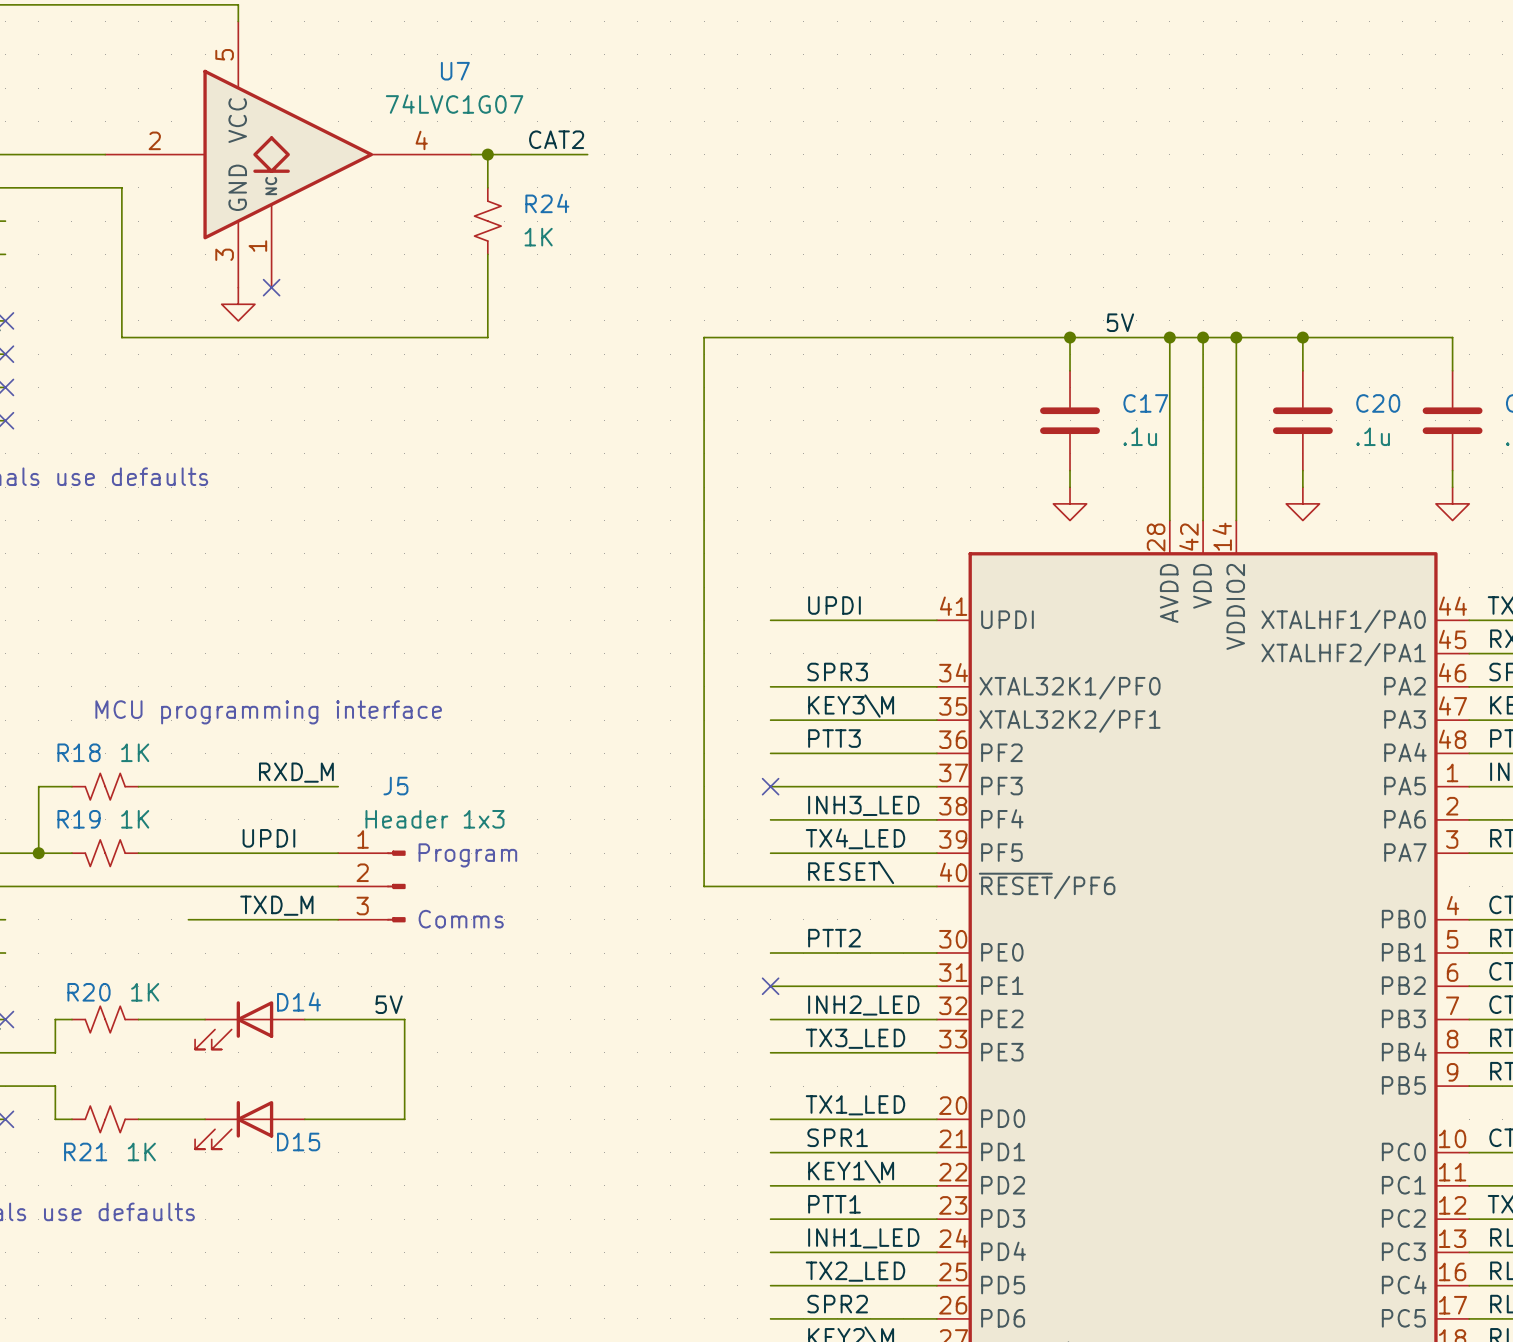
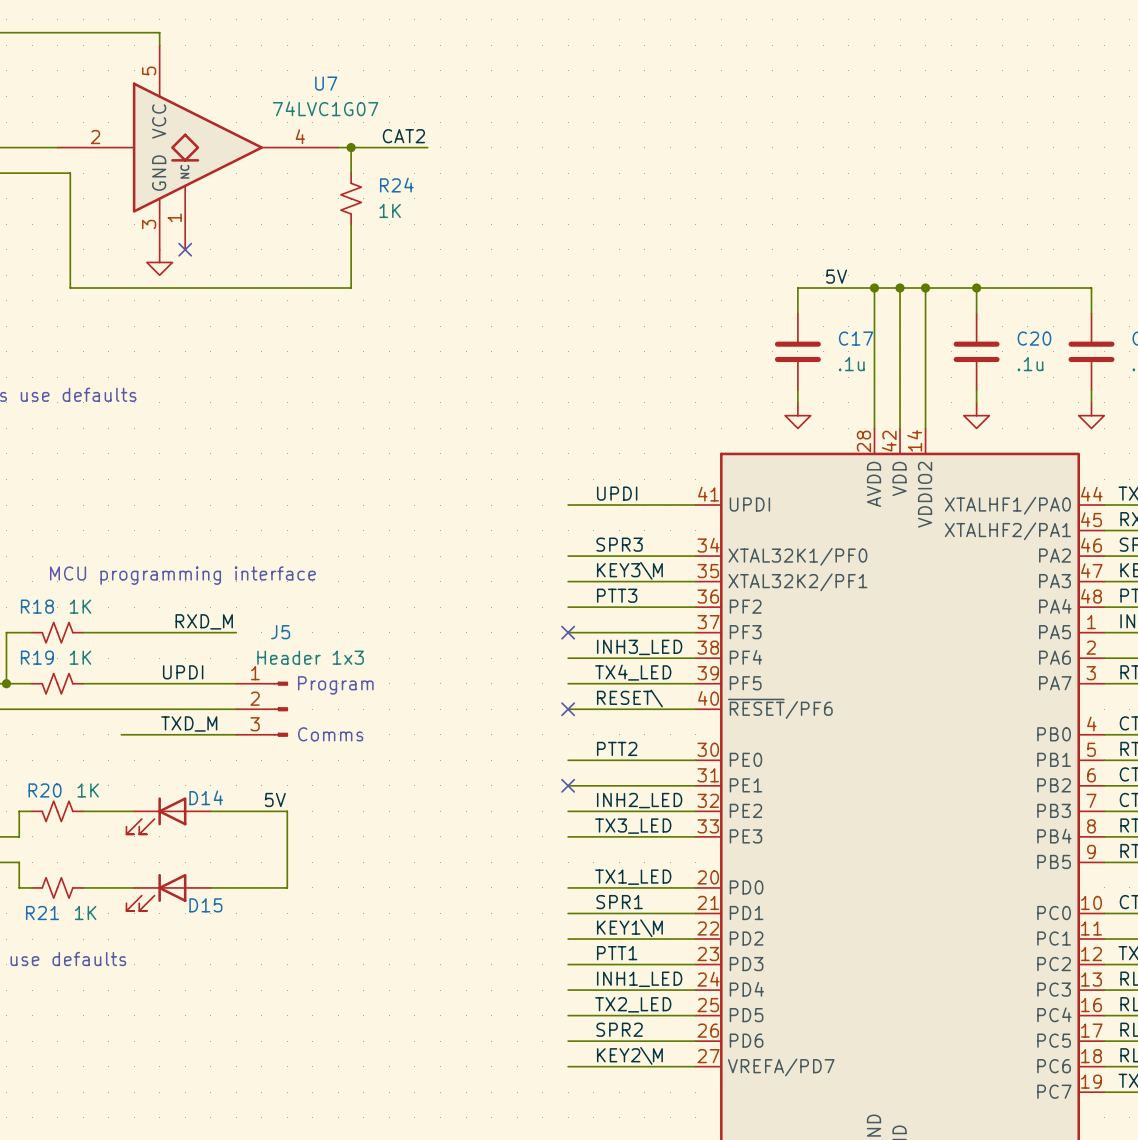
wire: (1070, 337) (704, 337) (704, 886) (770, 886) -> none
junction: (1070, 337) -> none
no-connect mark: none -> (568, 709)

